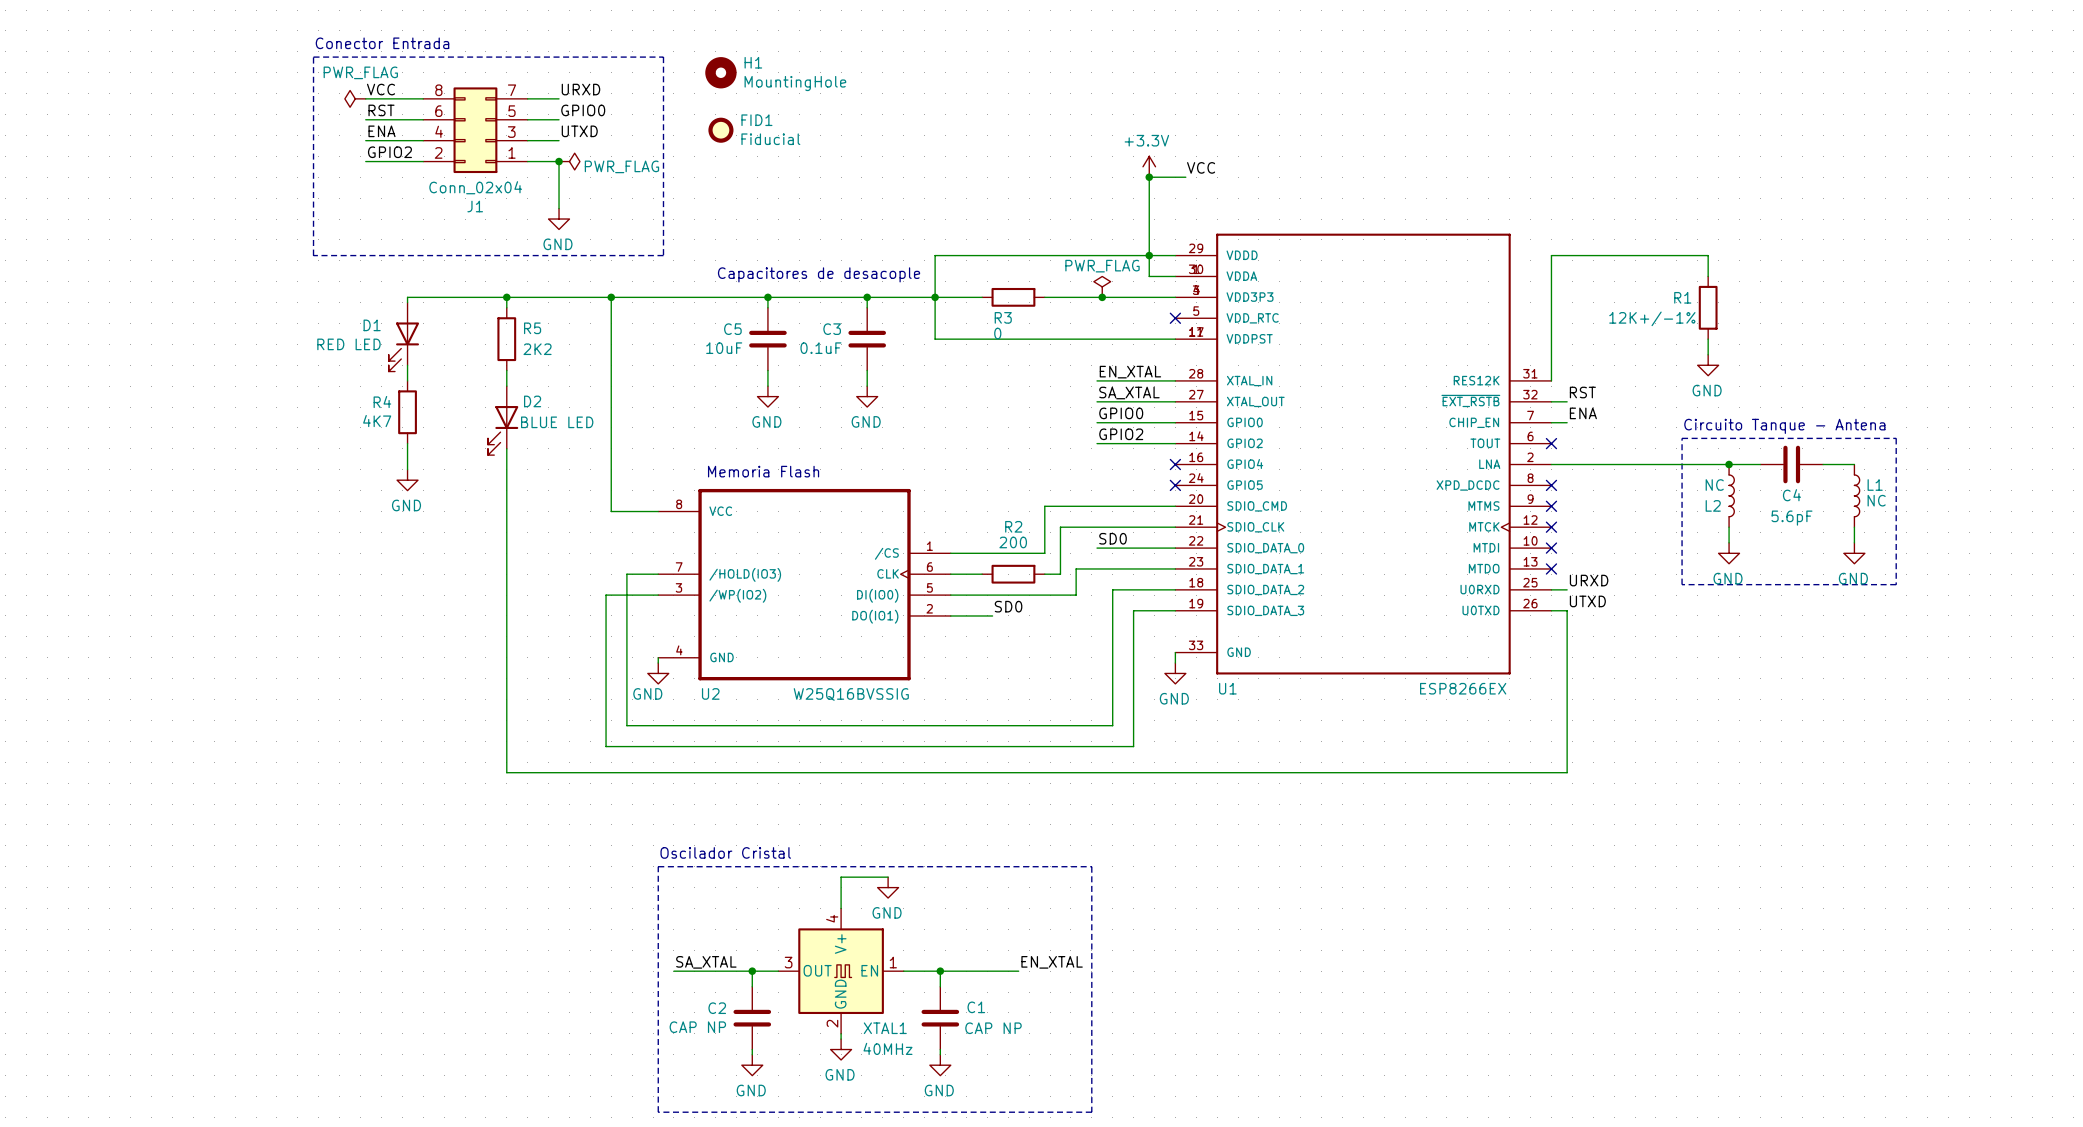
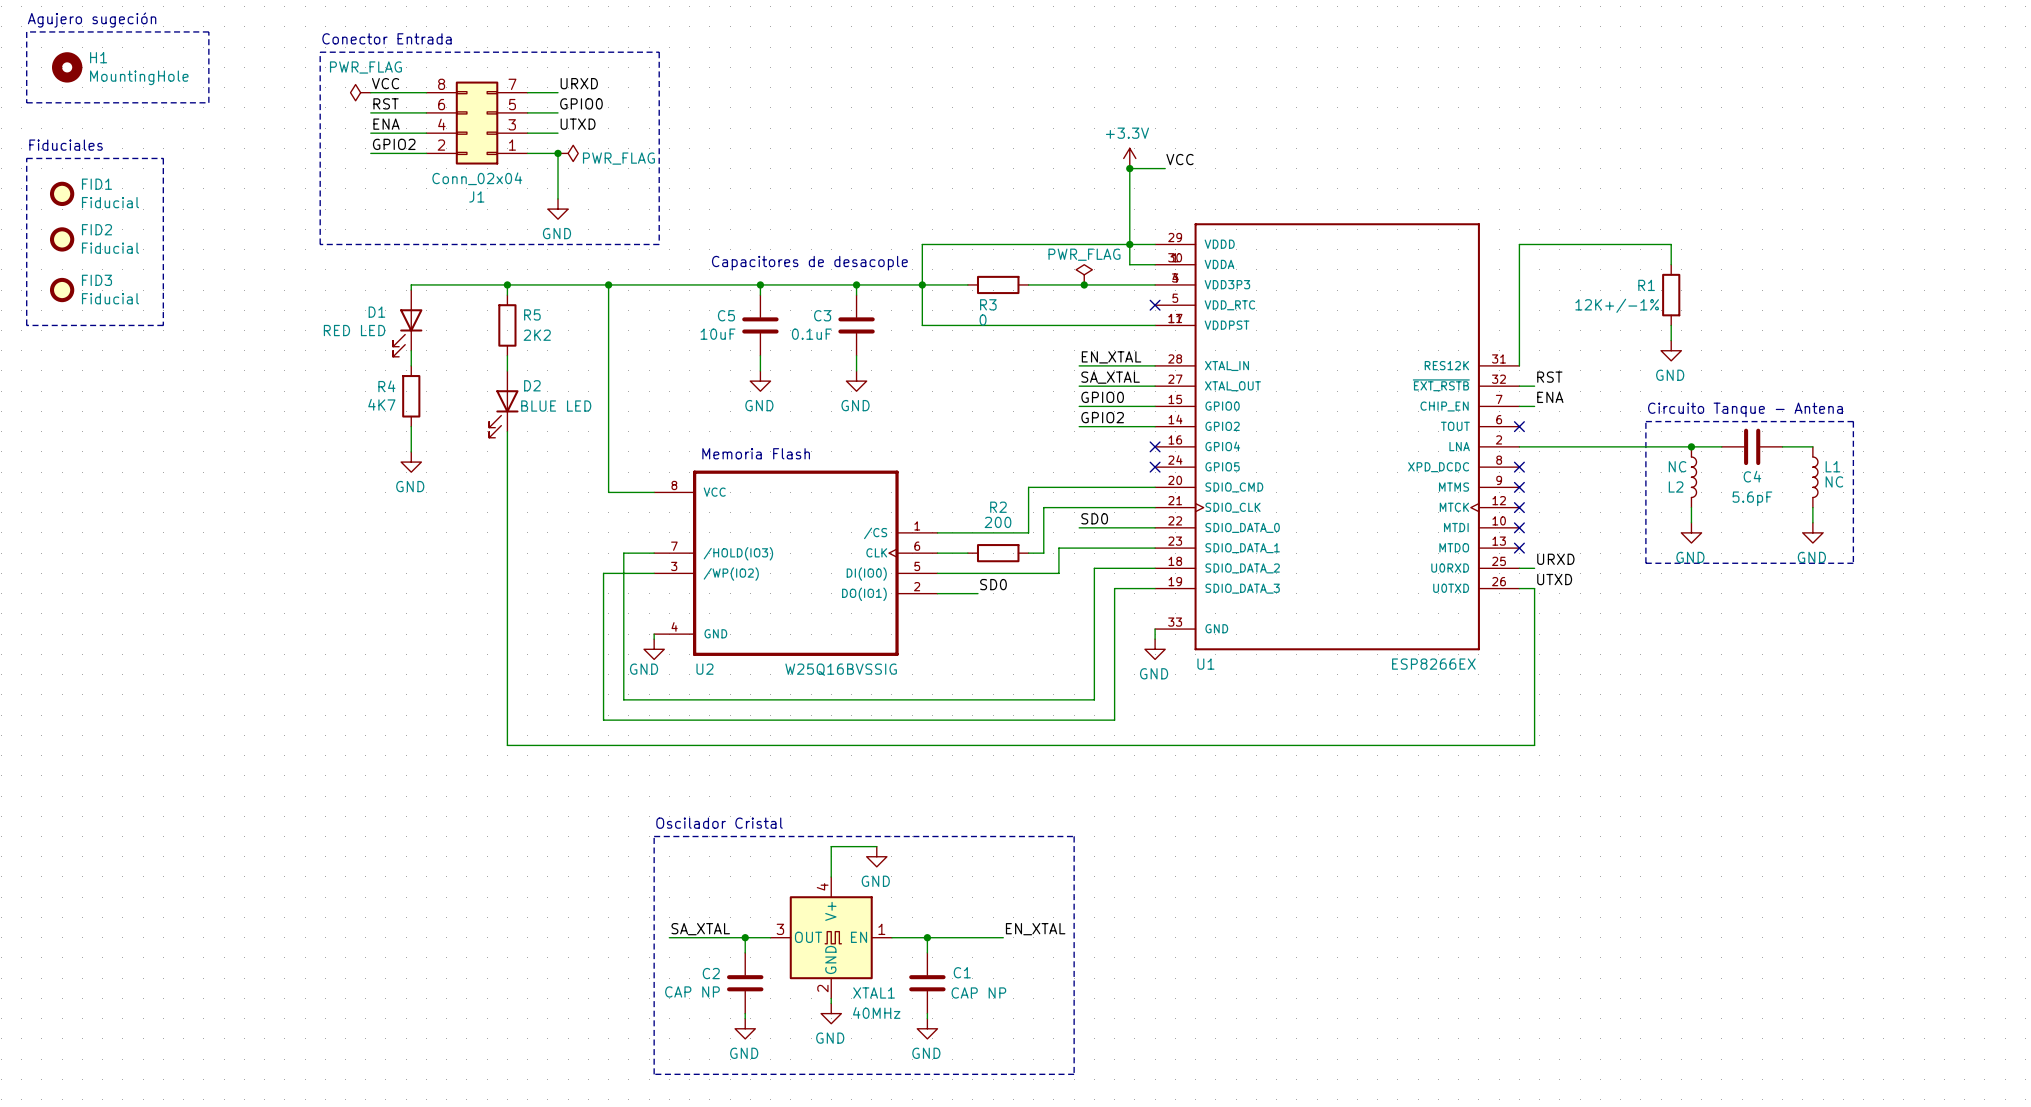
text: none -> Agujero sugeción (92, 20)
line: none -> (26, 31) (26, 102) (208, 102) (208, 31) (26, 31)
H1 position: (720, 72) -> (67, 67)
FID1 position: (720, 130) -> (62, 193)
text: none -> Fiduciales (66, 145)
line: none -> (26, 158) (163, 158) (163, 325) (26, 325) (26, 158)
FID2: none -> Fiducial (62, 239)
FID3: none -> Fiducial (62, 290)

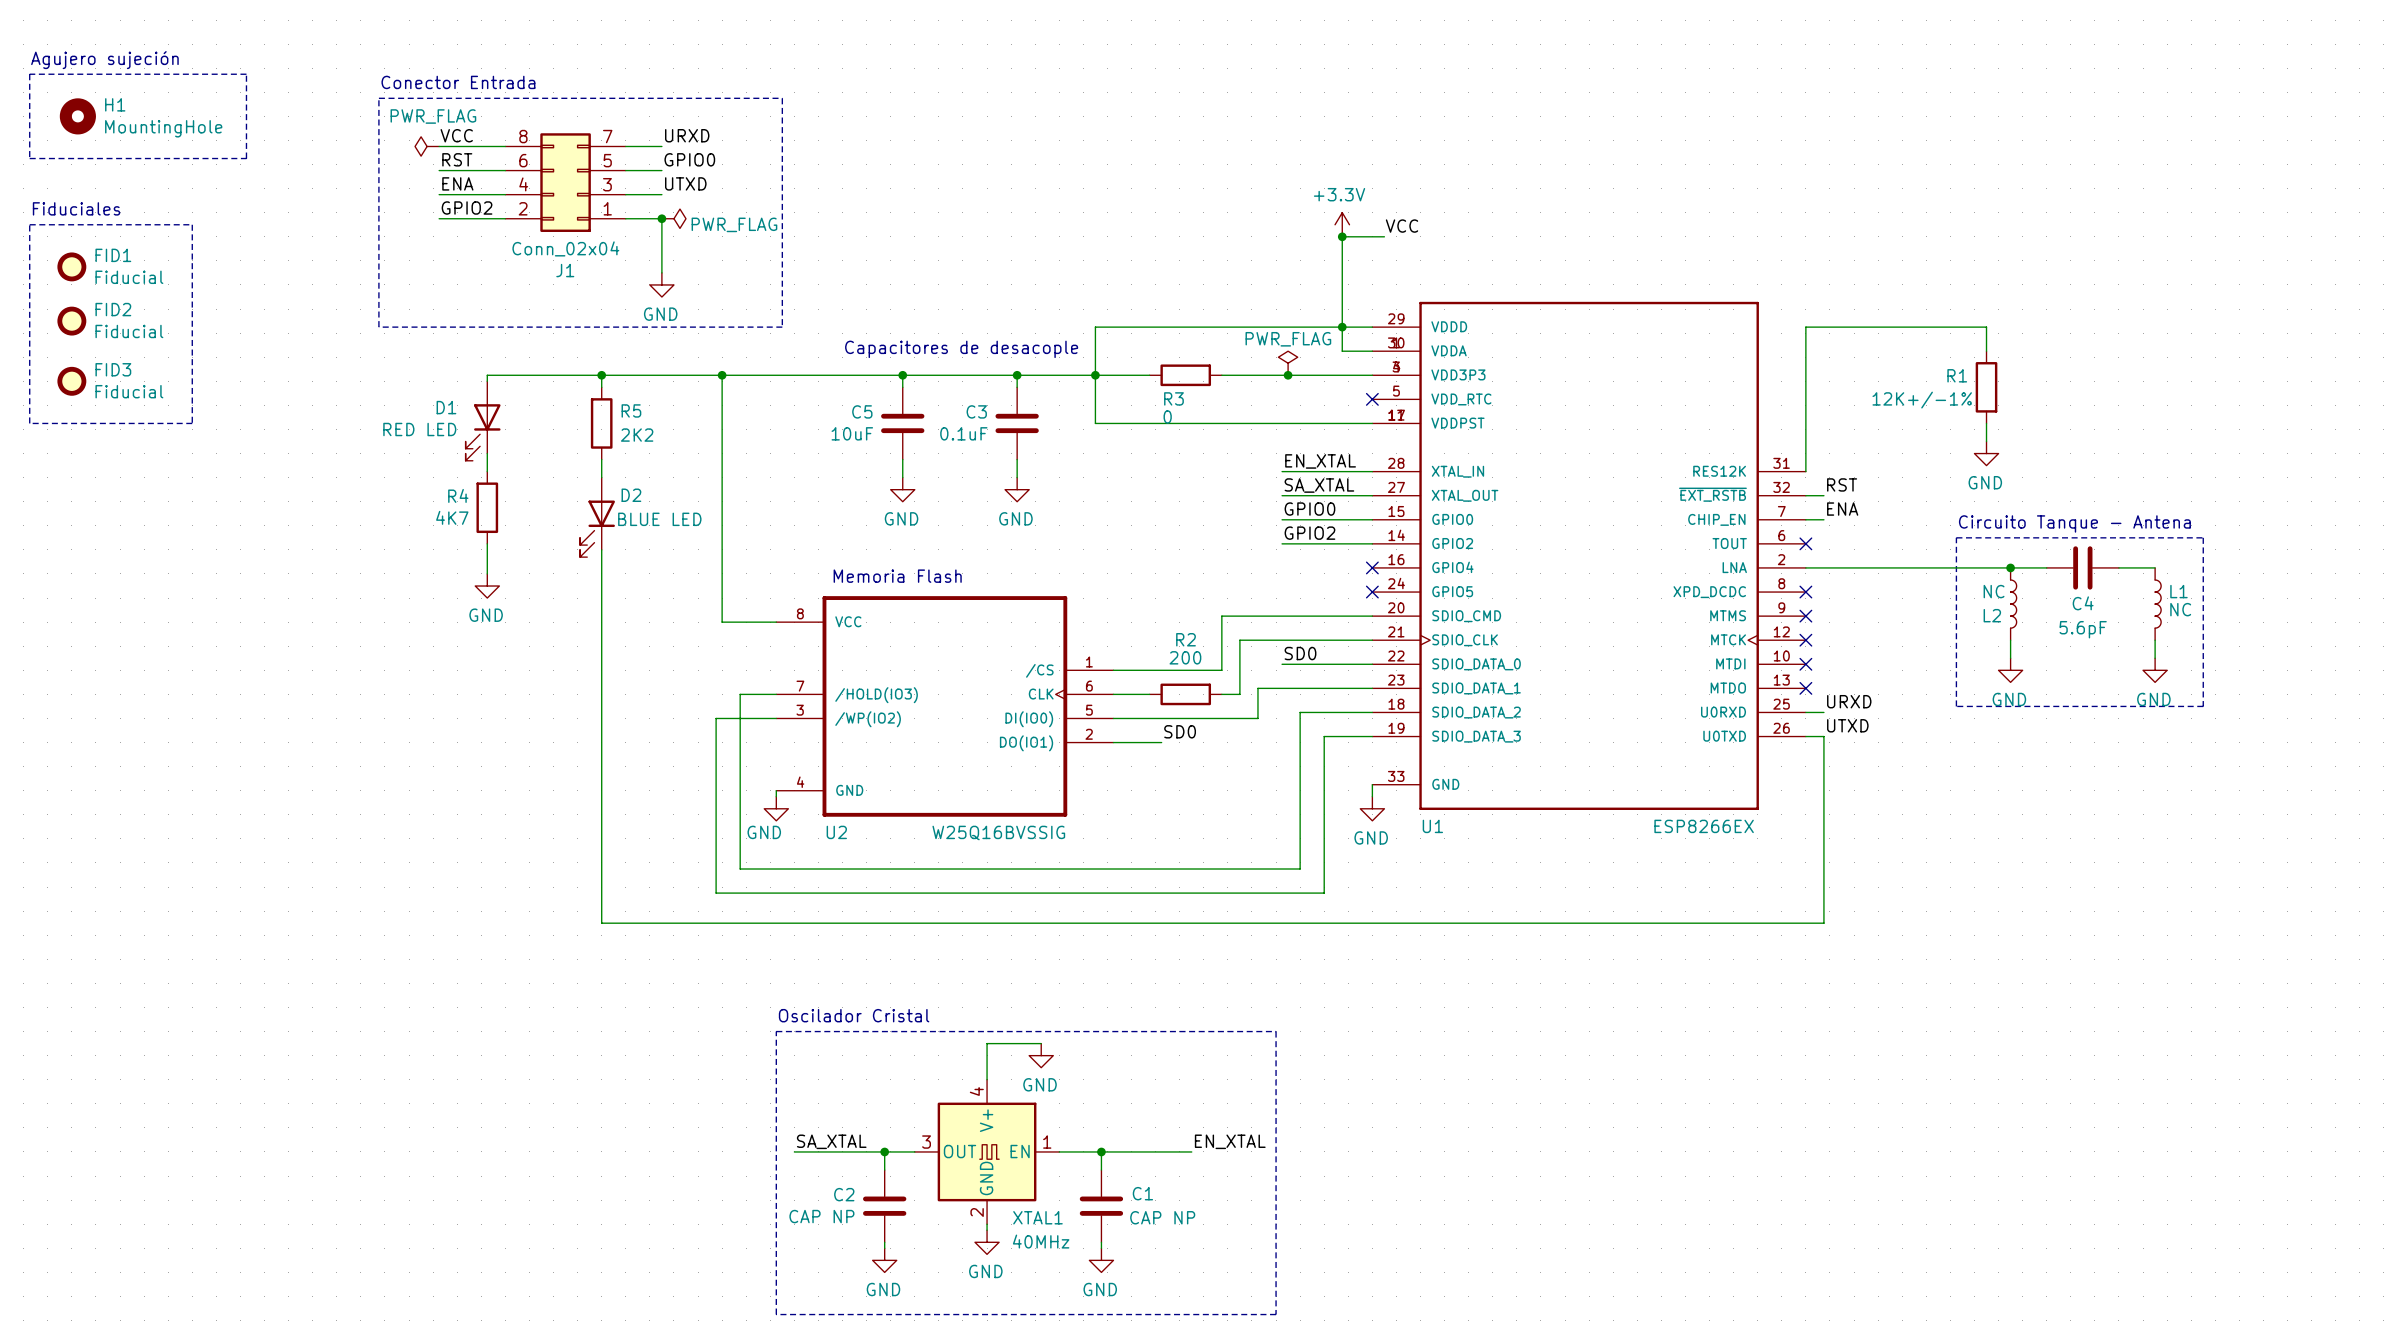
text: Agujero sugeción (92, 20) -> Agujero sujeción (104, 60)

